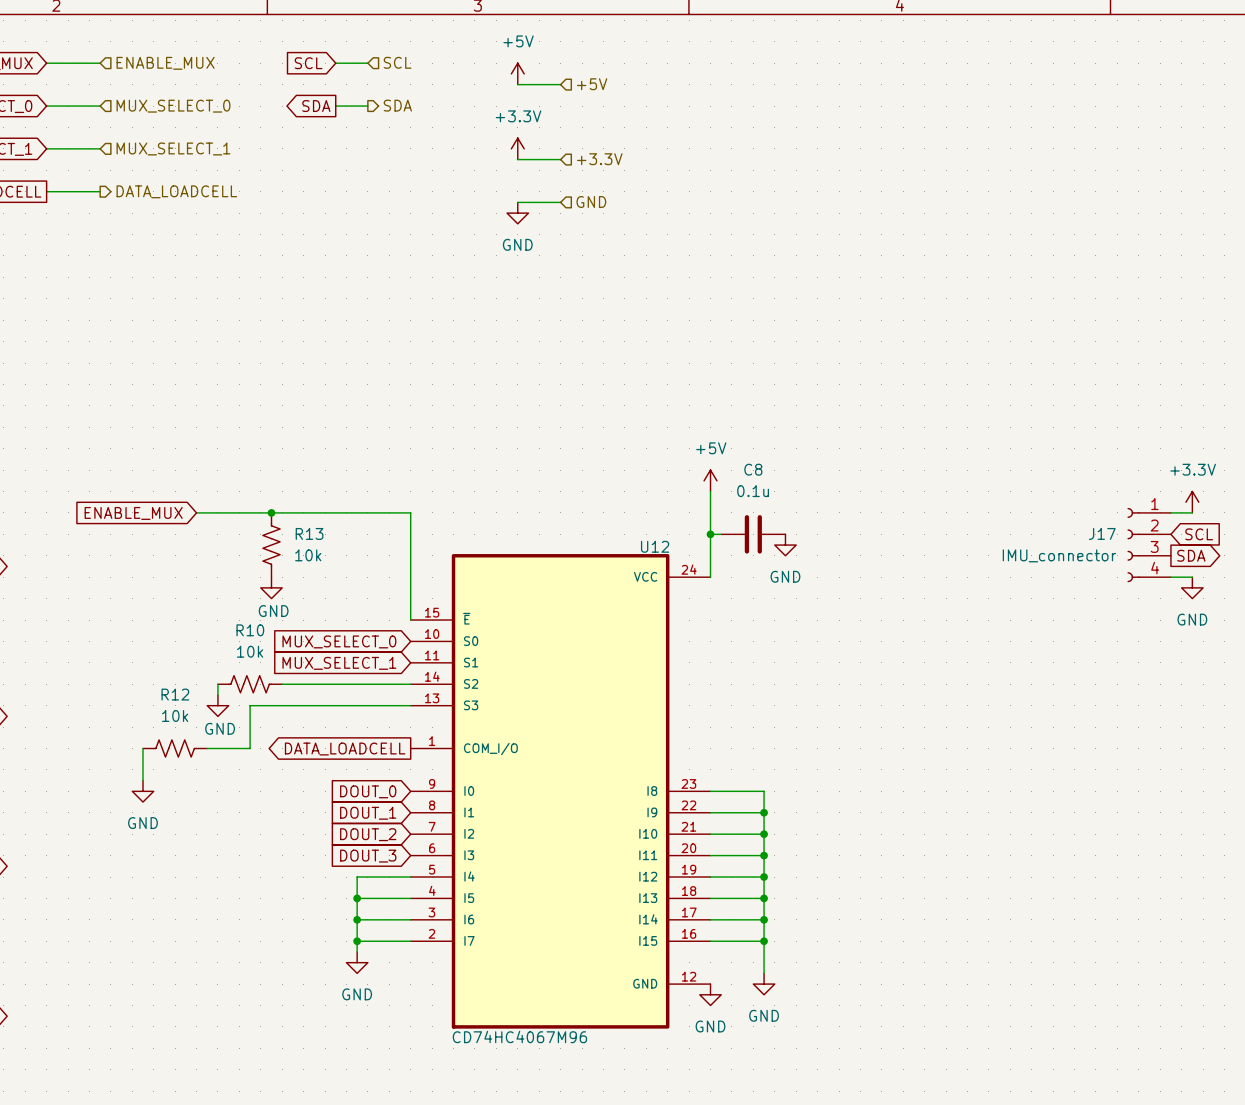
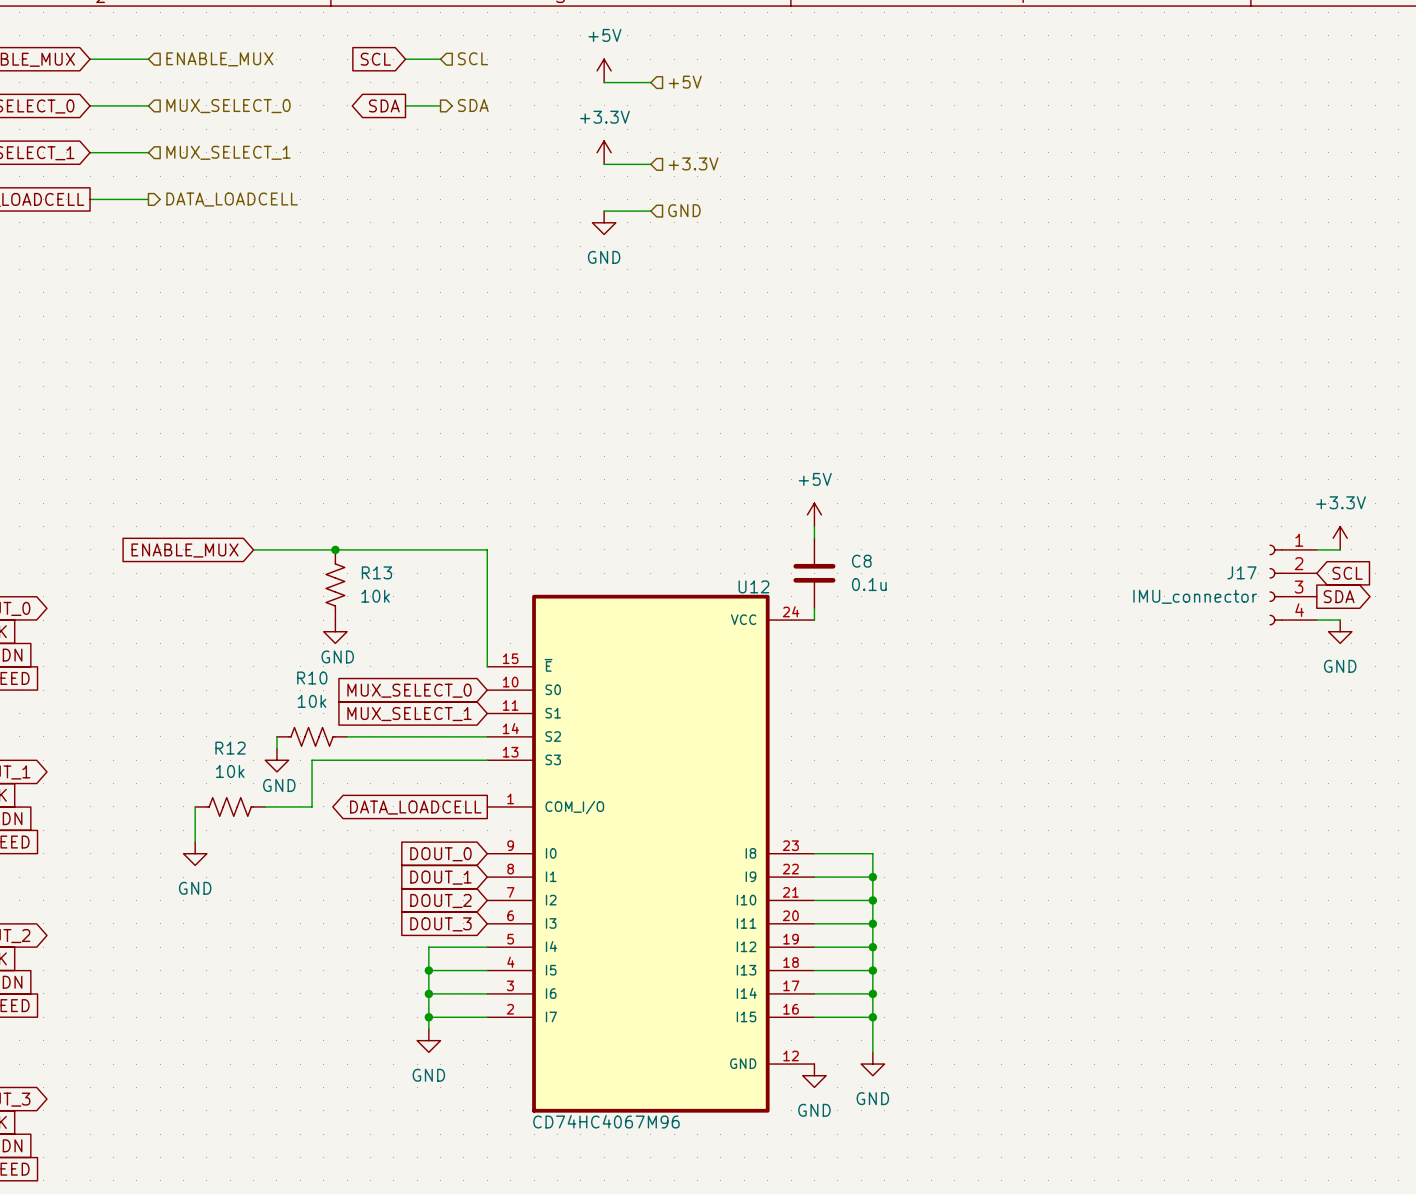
C8 name position: C8 (753, 469) -> C8 (861, 561)
wire: (710, 534) (721, 534) -> none
junction: (710, 534) -> none
C8 rotation: 0° (753, 534) -> 90° clockwise (814, 573)
C8 position: (753, 534) -> (814, 573)
power symbol: GND (785, 545) -> none

